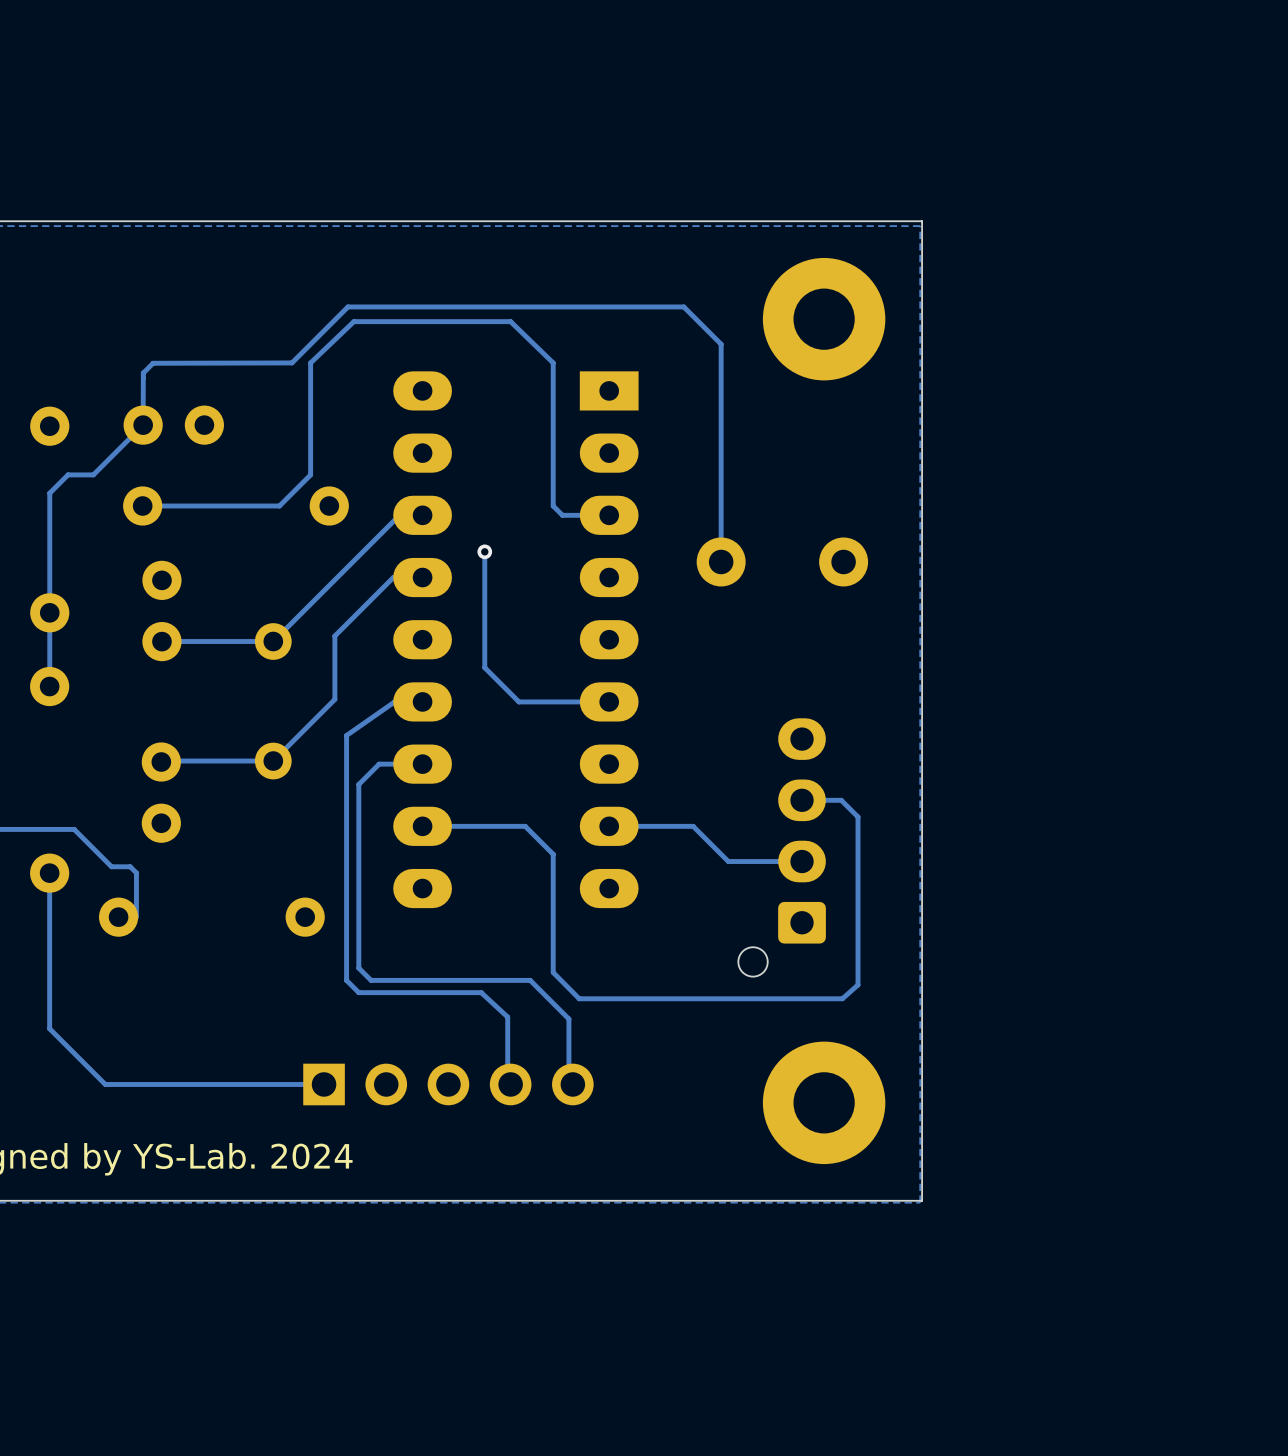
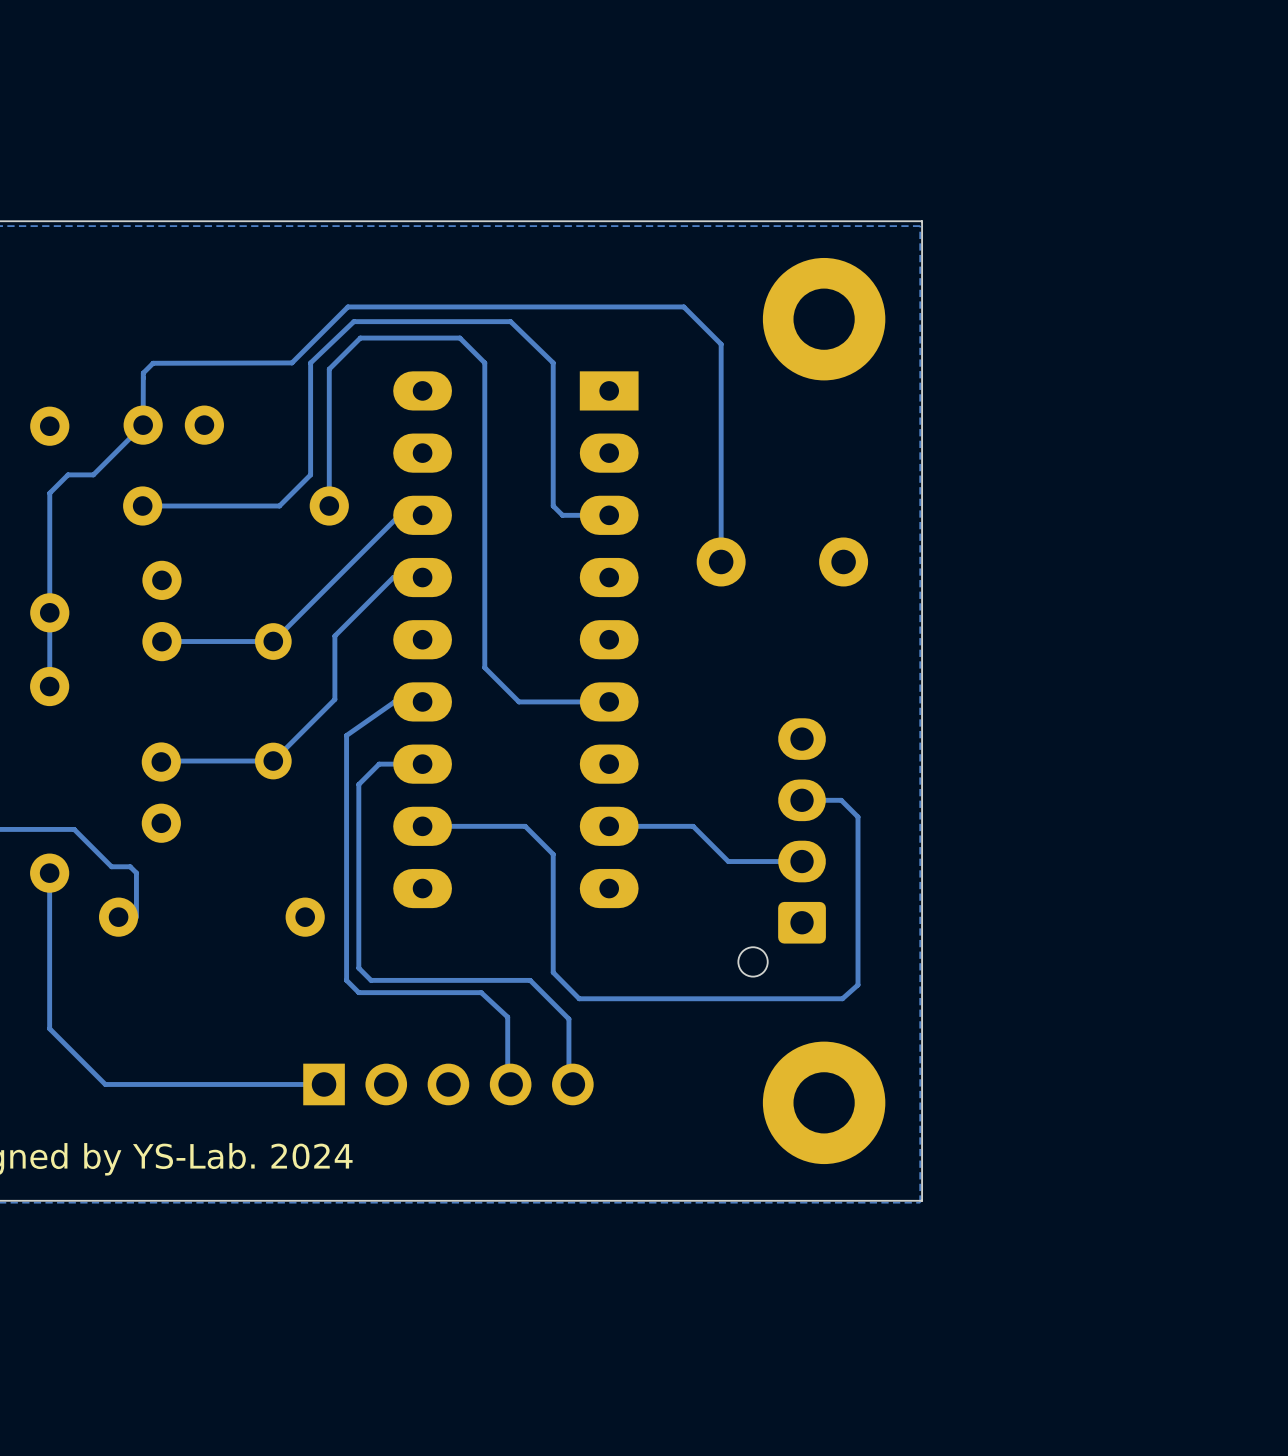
track: none -> (329, 505) (329, 369) (360, 338) (459, 338) (484, 362) (484, 551)
via: (484, 551) -> none

